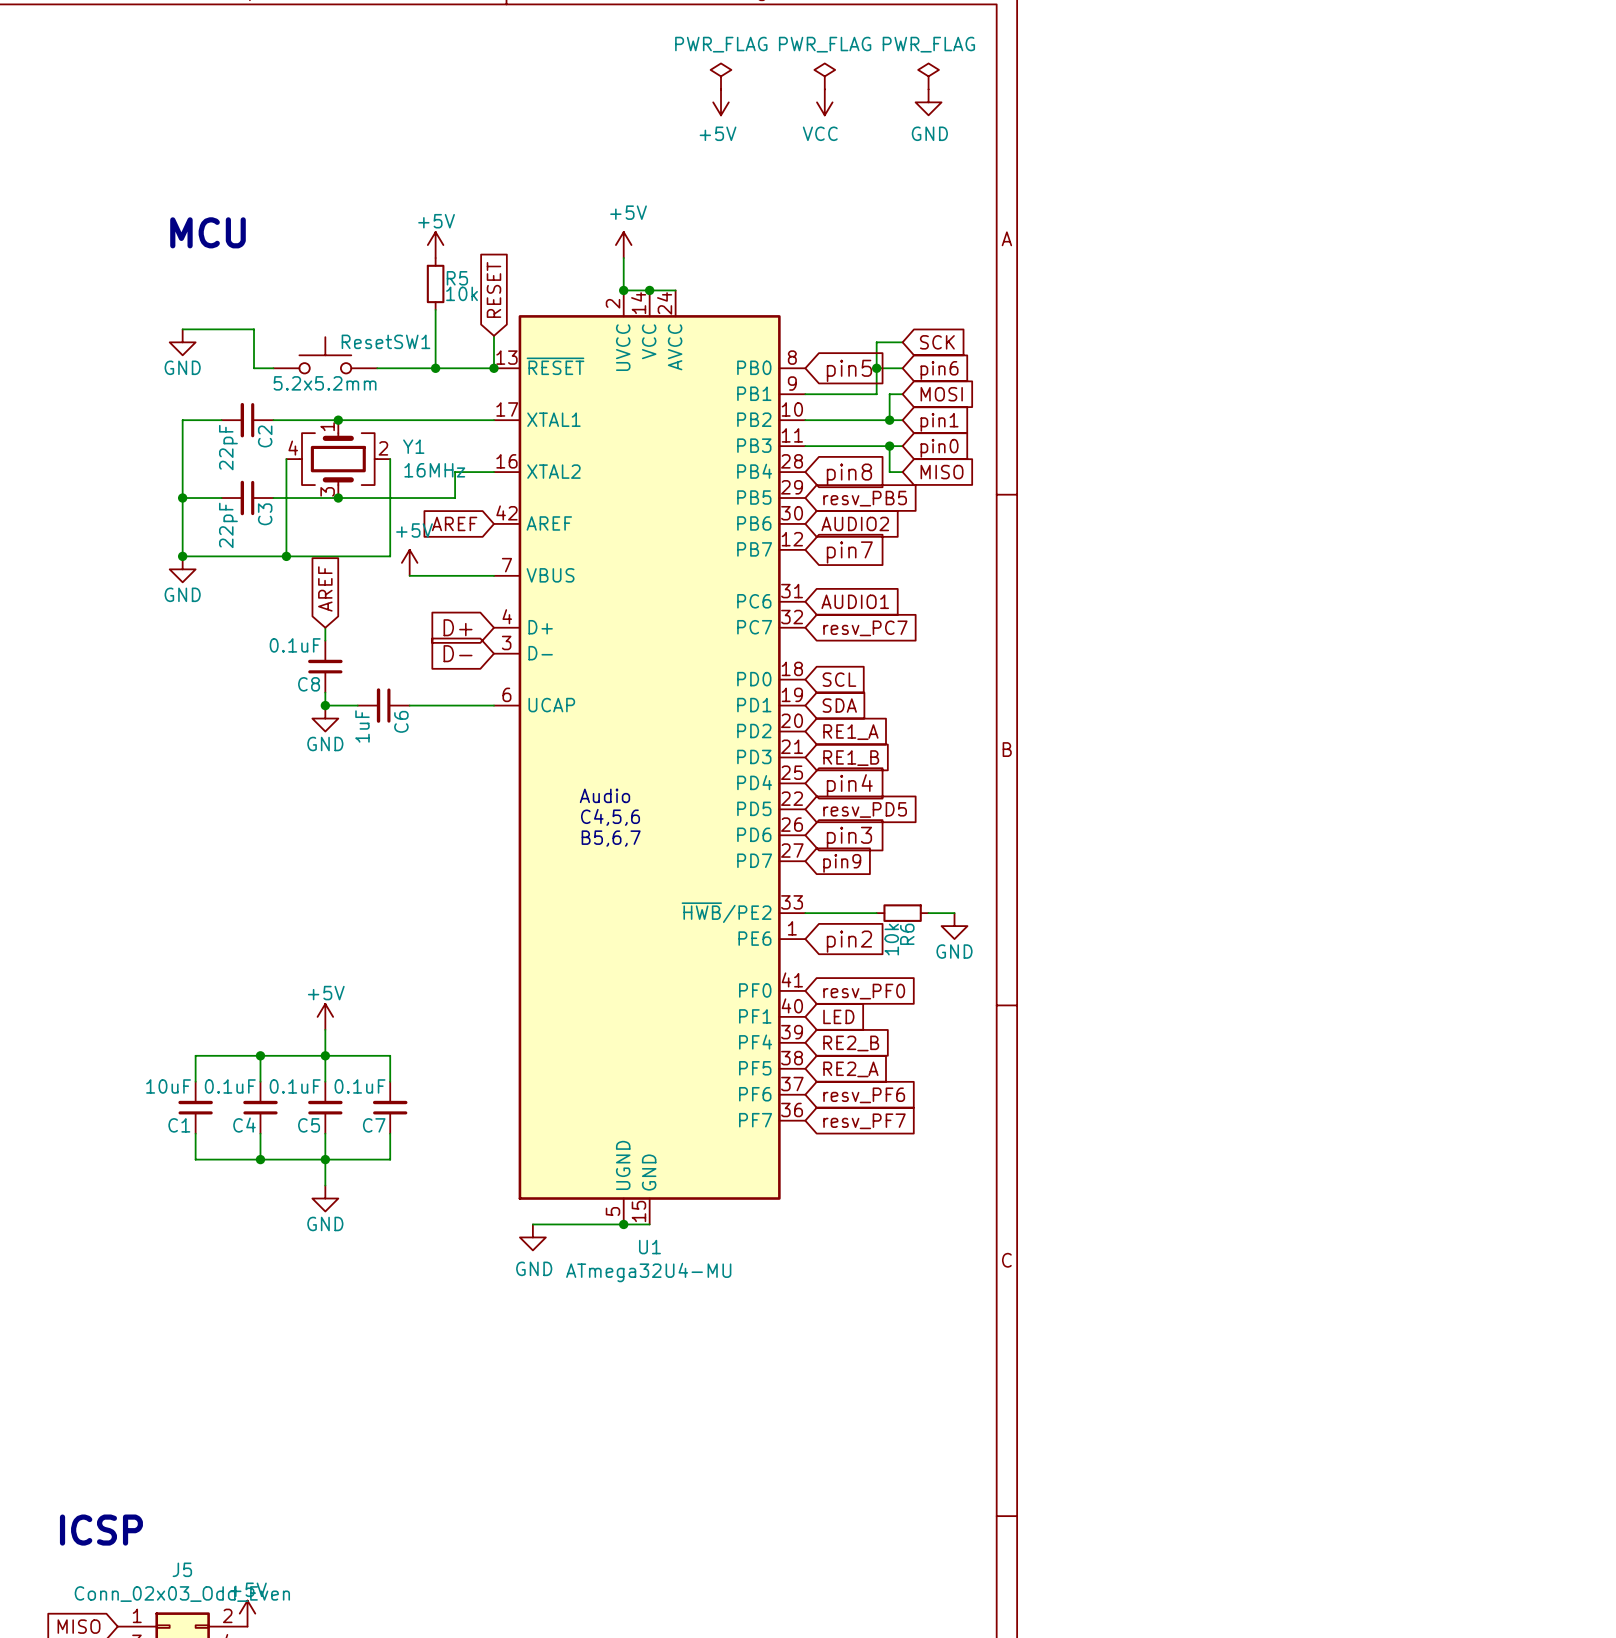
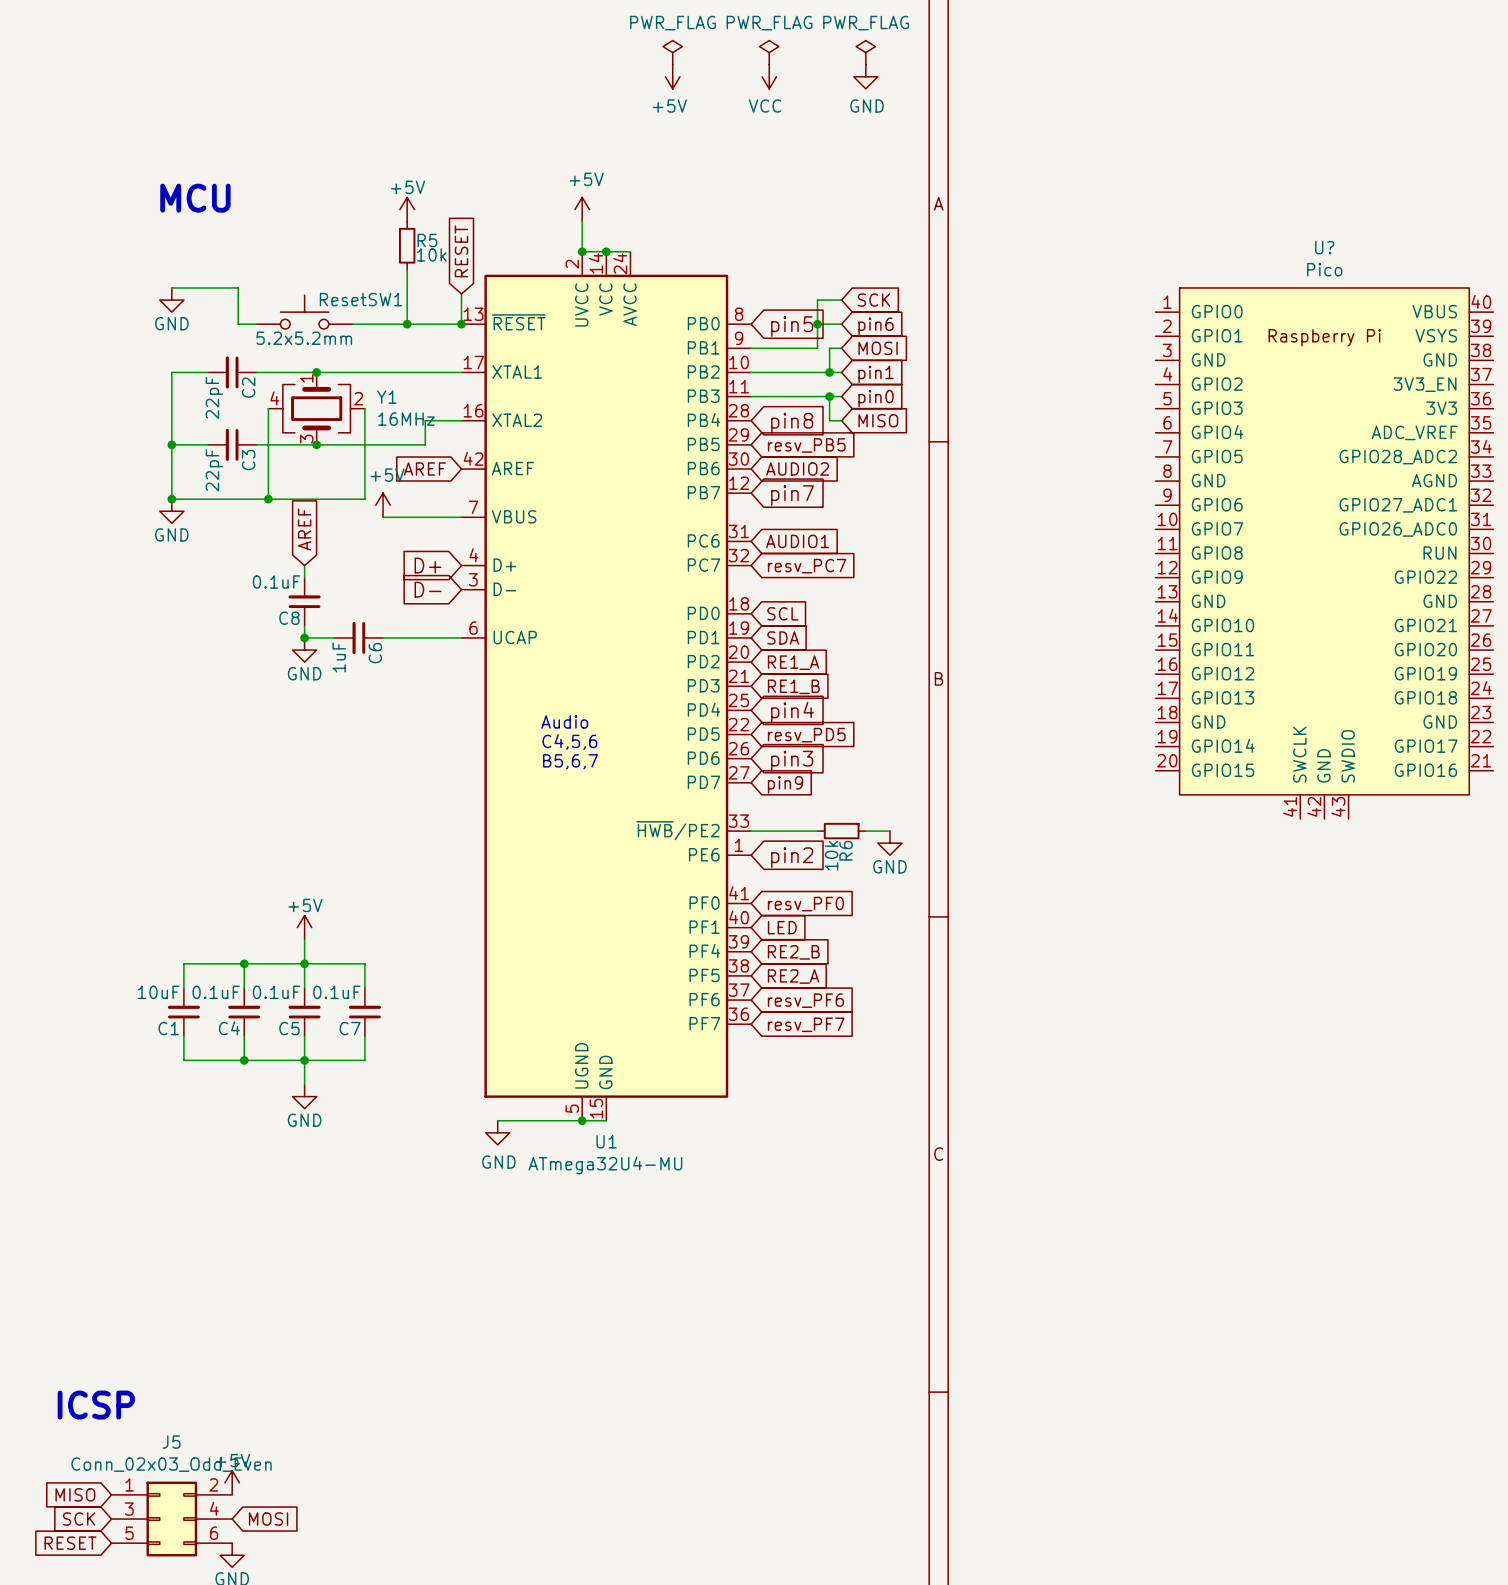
U?: none -> Pico (1324, 553)

